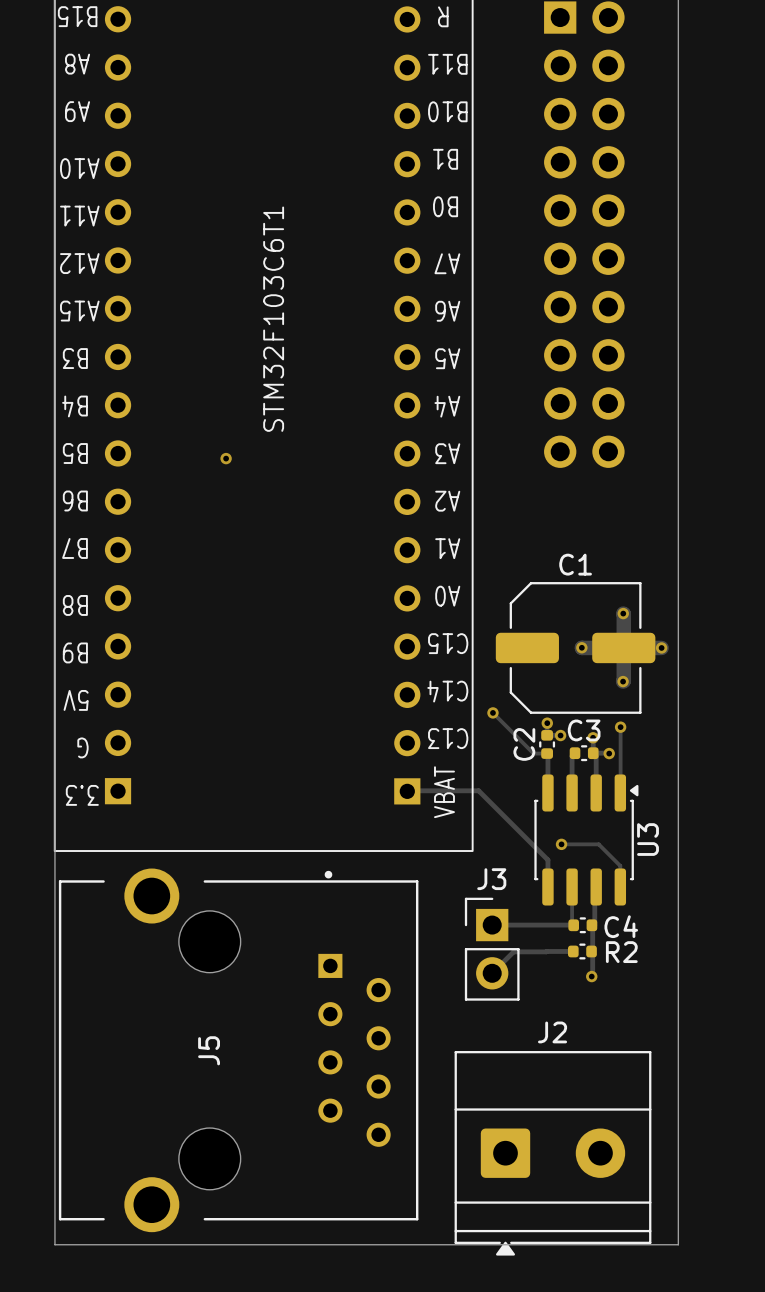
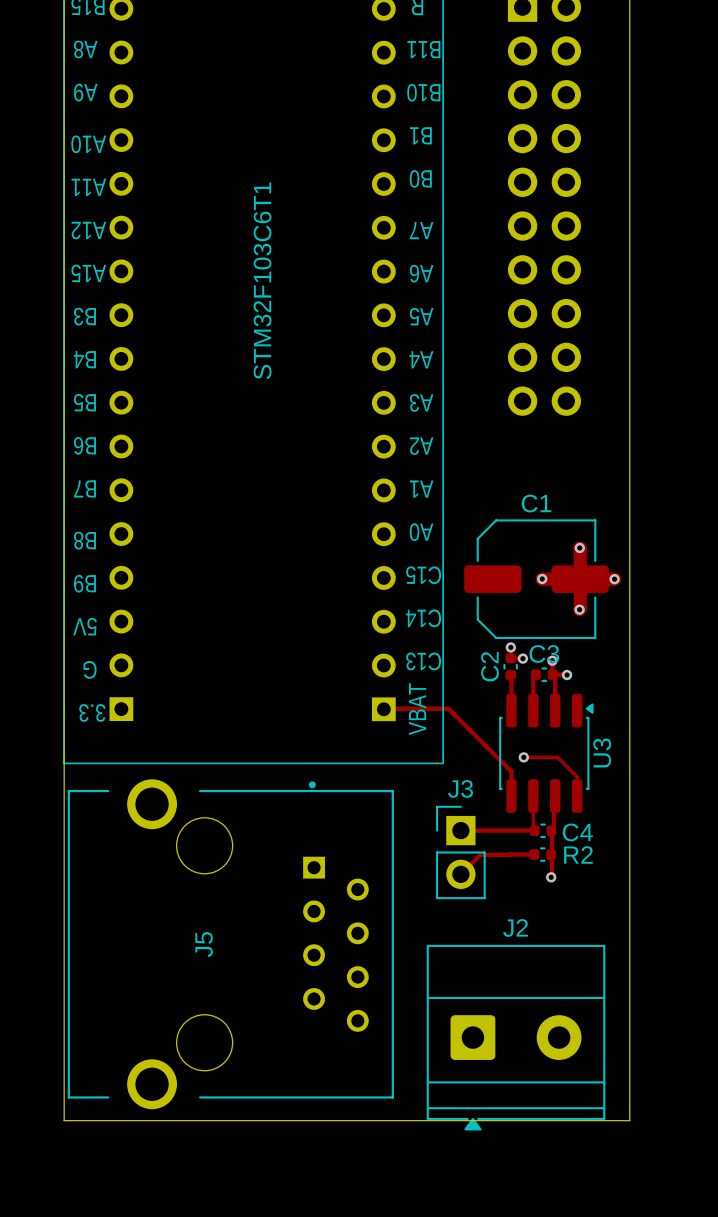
via: (226, 458) -> none
track: (492, 712) (533, 753) (547, 753) -> none
via: (492, 712) -> none
track: (620, 727) (620, 792) -> none
via: (620, 727) -> none

